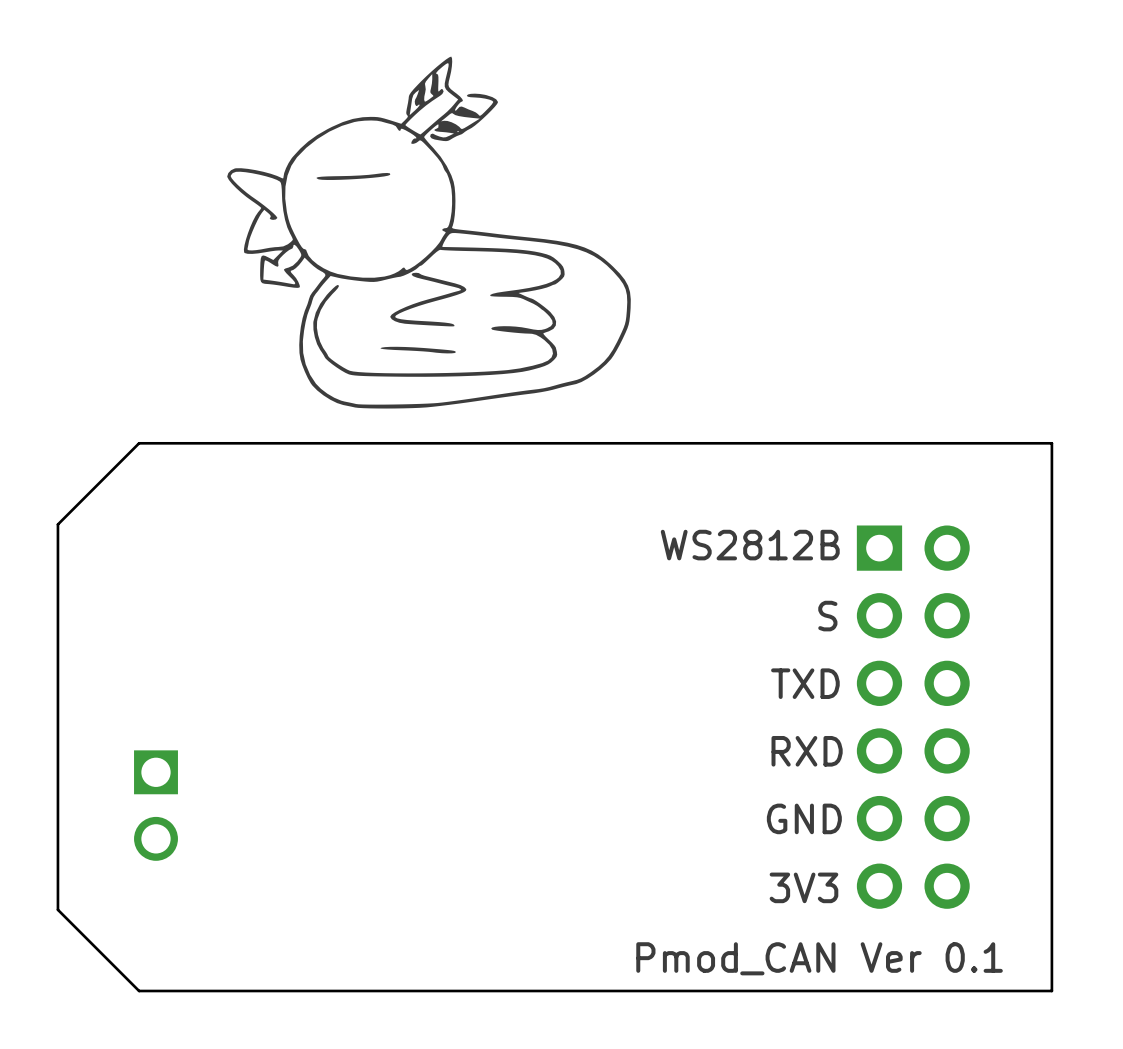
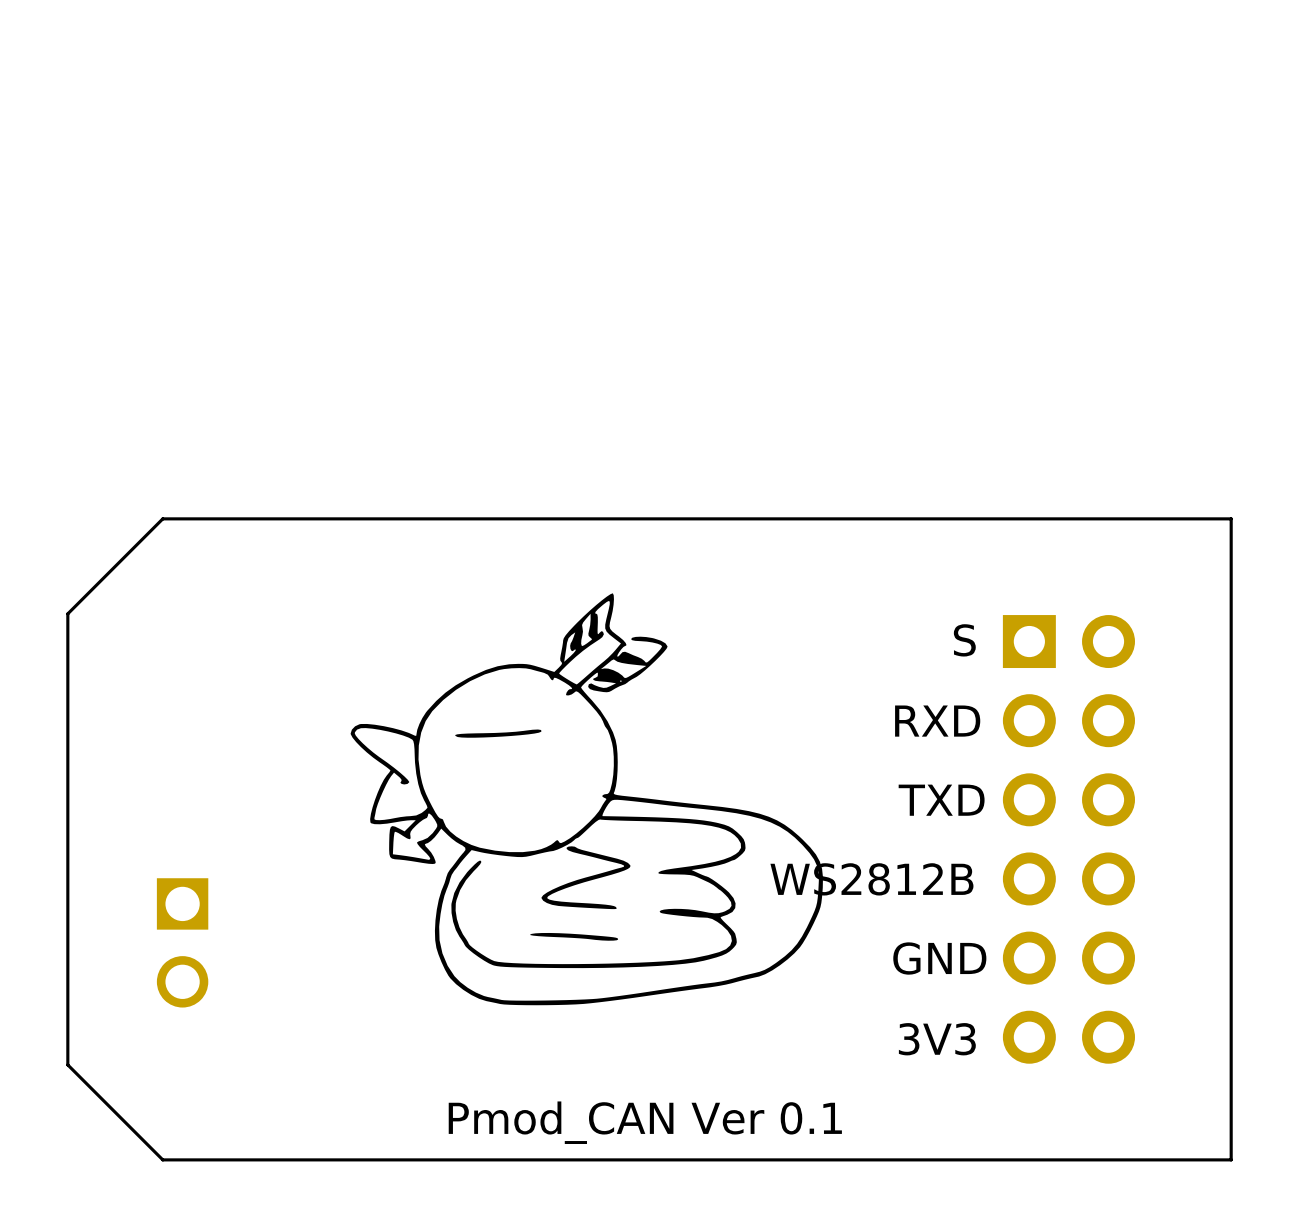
drawing position: (429, 232) -> (586, 799)
text position: WS2812B (750, 545) -> WS2812B (871, 879)
text position: S (827, 616) -> S (964, 640)
text position: RXD (807, 751) -> RXD (937, 721)
text position: Pmod_CAN Ver 0.1 (819, 958) -> Pmod_CAN Ver 0.1 (645, 1122)

